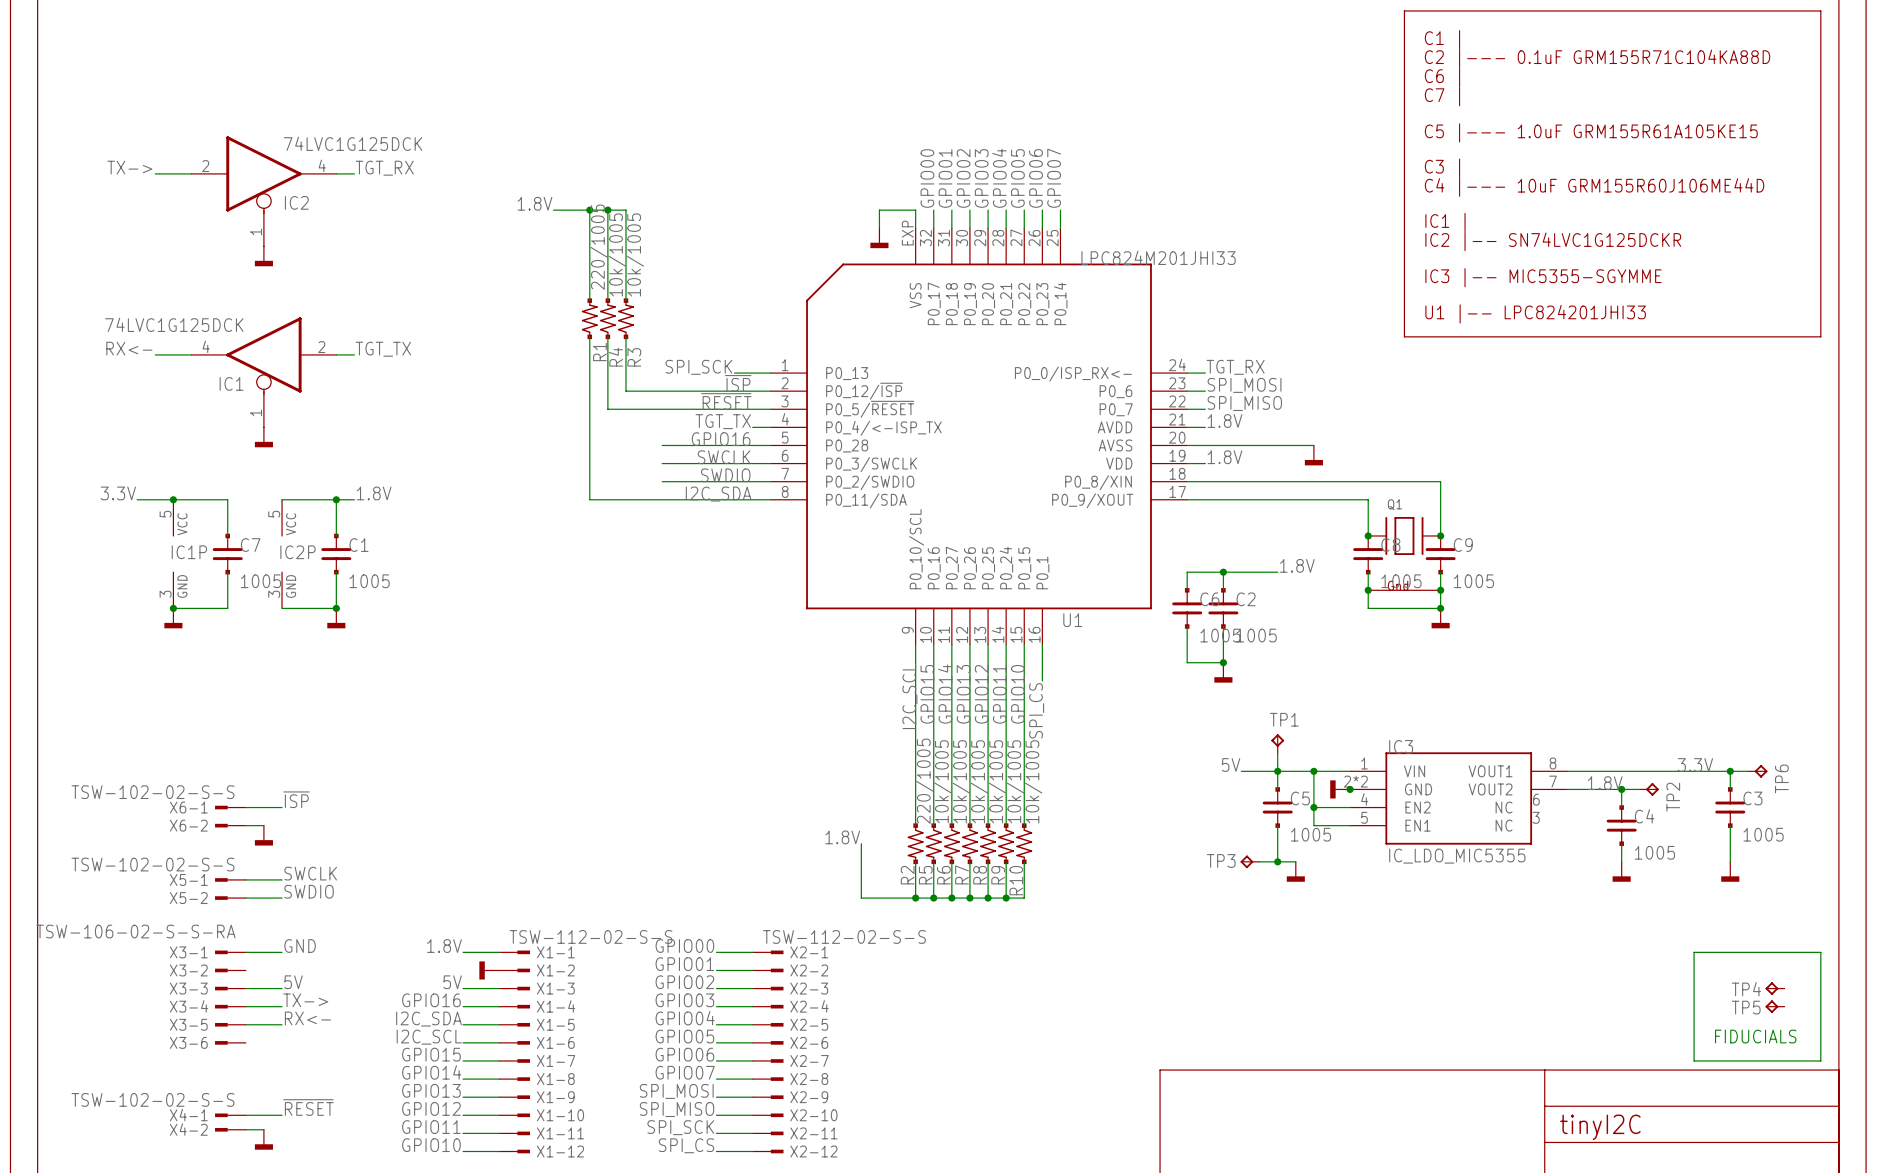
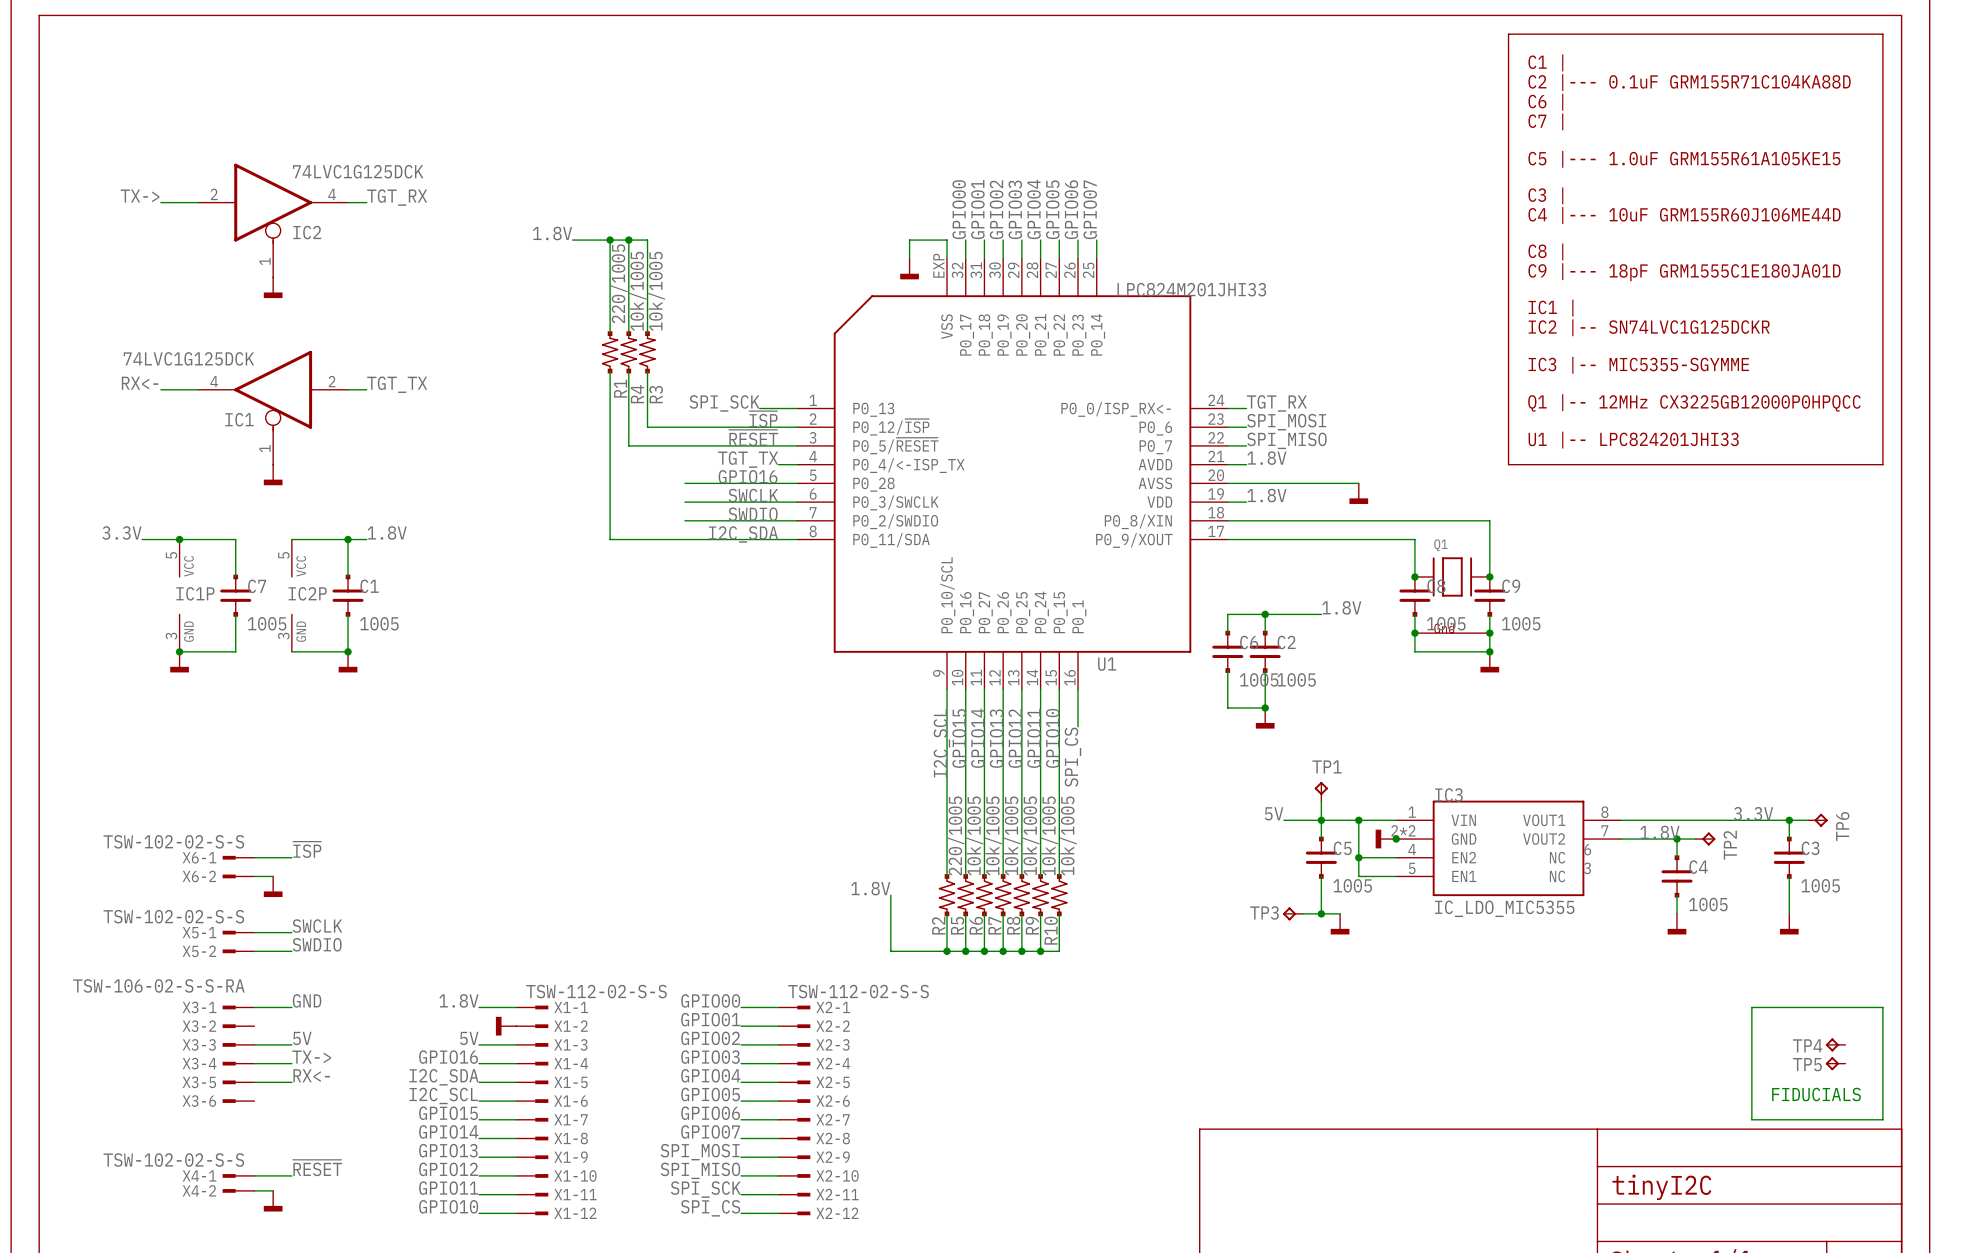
line: (1458, 10) (1404, 10) (1404, 336) (1820, 336) -> (1508, 34) (1508, 464) (1882, 464) (1882, 371)
text position: C1 | (1442, 39) -> C1 | (1545, 62)
text position: C2 |--- 0.1uF GRM155R71C104KA88D (1597, 58) -> C2 |--- 0.1uF GRM155R71C104KA88D (1689, 82)
text position: C6 | (1442, 77) -> C6 | (1545, 102)
text position: C7 | (1442, 96) -> C7 | (1545, 121)
text position: C5 |--- 1.0uF GRM155R61A105KE15 (1591, 132) -> C5 |--- 1.0uF GRM155R61A105KE15 (1684, 159)
text position: C3 | (1442, 168) -> C3 | (1545, 195)
text position: C4 |--- 10uF GRM155R60J106ME44D (1594, 187) -> C4 |--- 10uF GRM155R60J106ME44D (1684, 215)
text position: IC1 | (1445, 222) -> IC1 | (1551, 308)
text: none -> C8 | (1545, 251)
text position: IC2 |-- SN74LVC1G125DCKR (1553, 241) -> IC2 |-- SN74LVC1G125DCKR (1649, 327)
text: none -> C9 |--- 18pF GRM1555C1E180JA01D (1684, 272)
text position: IC3 |-- MIC5355-SGYMME (1543, 277) -> IC3 |-- MIC5355-SGYMME (1638, 365)
text position: U1 |-- LPC824201JHI33 (1535, 313) -> U1 |-- LPC824201JHI33 (1633, 440)
text: none -> Q1 |-- 12MHz CX3225GB12000P0HPQCC (1694, 402)

